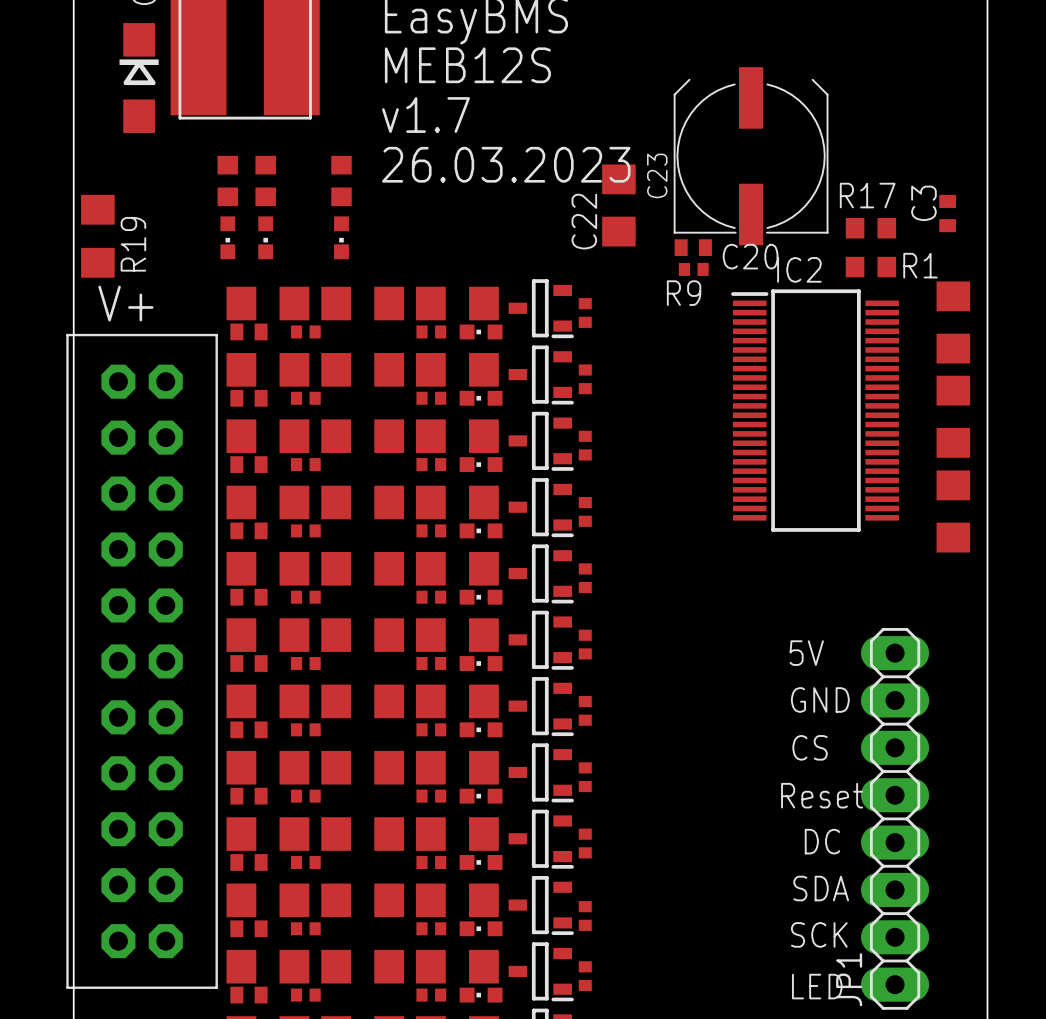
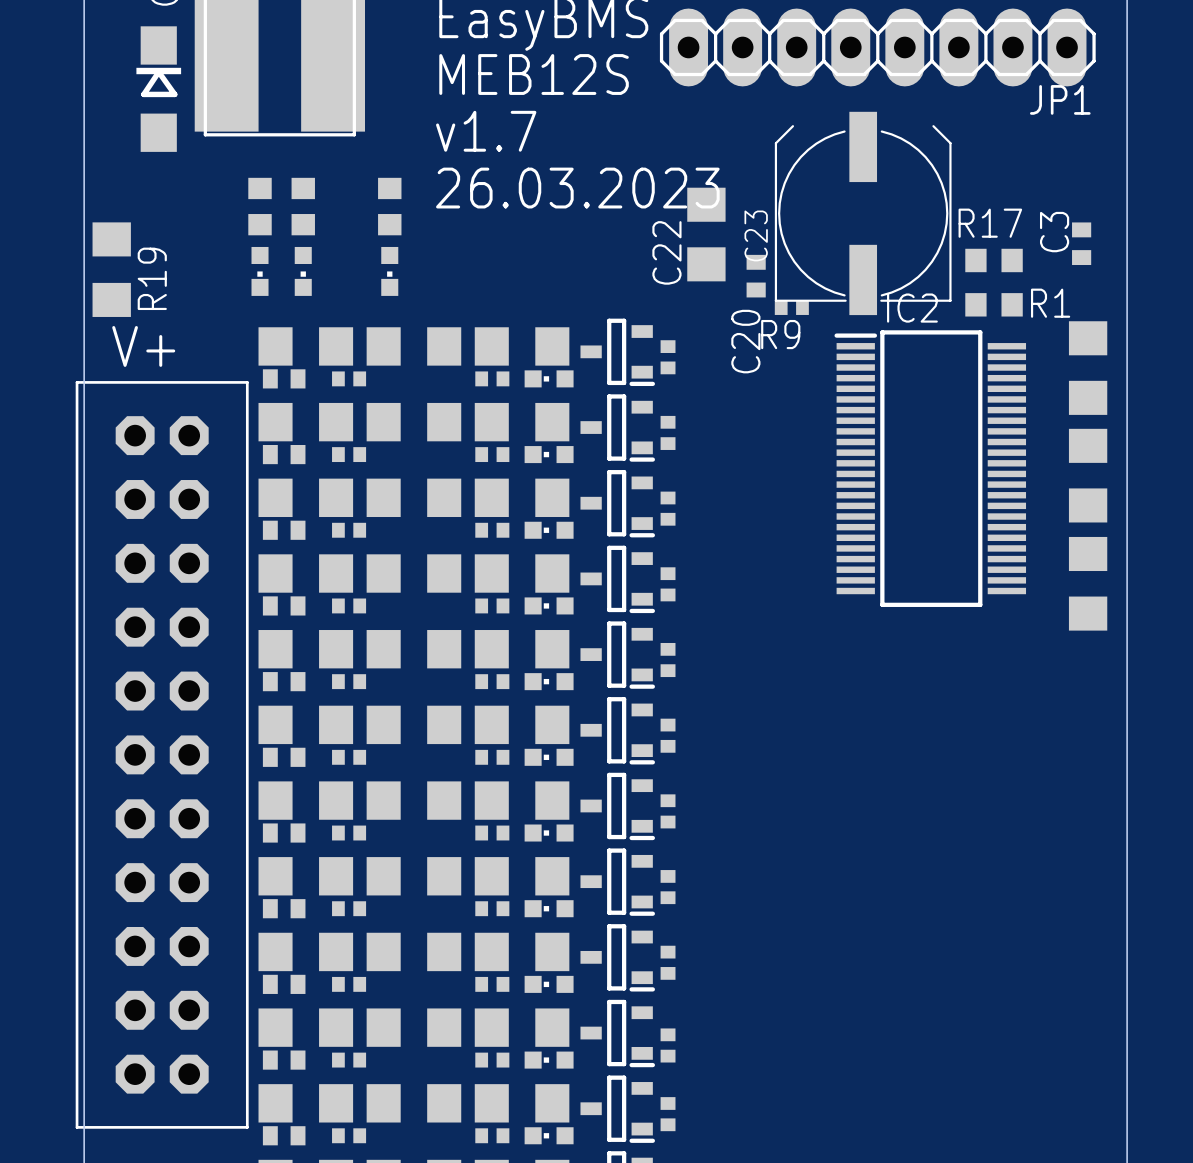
C23 position: (751, 156) -> (863, 213)
C20 rotation: 0° (693, 247) -> 90° clockwise (756, 276)
C20 position: (693, 247) -> (756, 276)
text: 5V (806, 653) -> none
text: GND (820, 699) -> none
text: CS (810, 747) -> none
text: Reset (822, 795) -> none
JP1 rotation: 0° (895, 818) -> 90° clockwise (877, 47)
JP1 position: (895, 818) -> (877, 47)
text: DC (822, 841) -> none
text: SDA (821, 888) -> none
text: SCK (819, 934) -> none
JP1 name position: JP1 (849, 979) -> JP1 (1060, 99)
text: LED (817, 986) -> none

